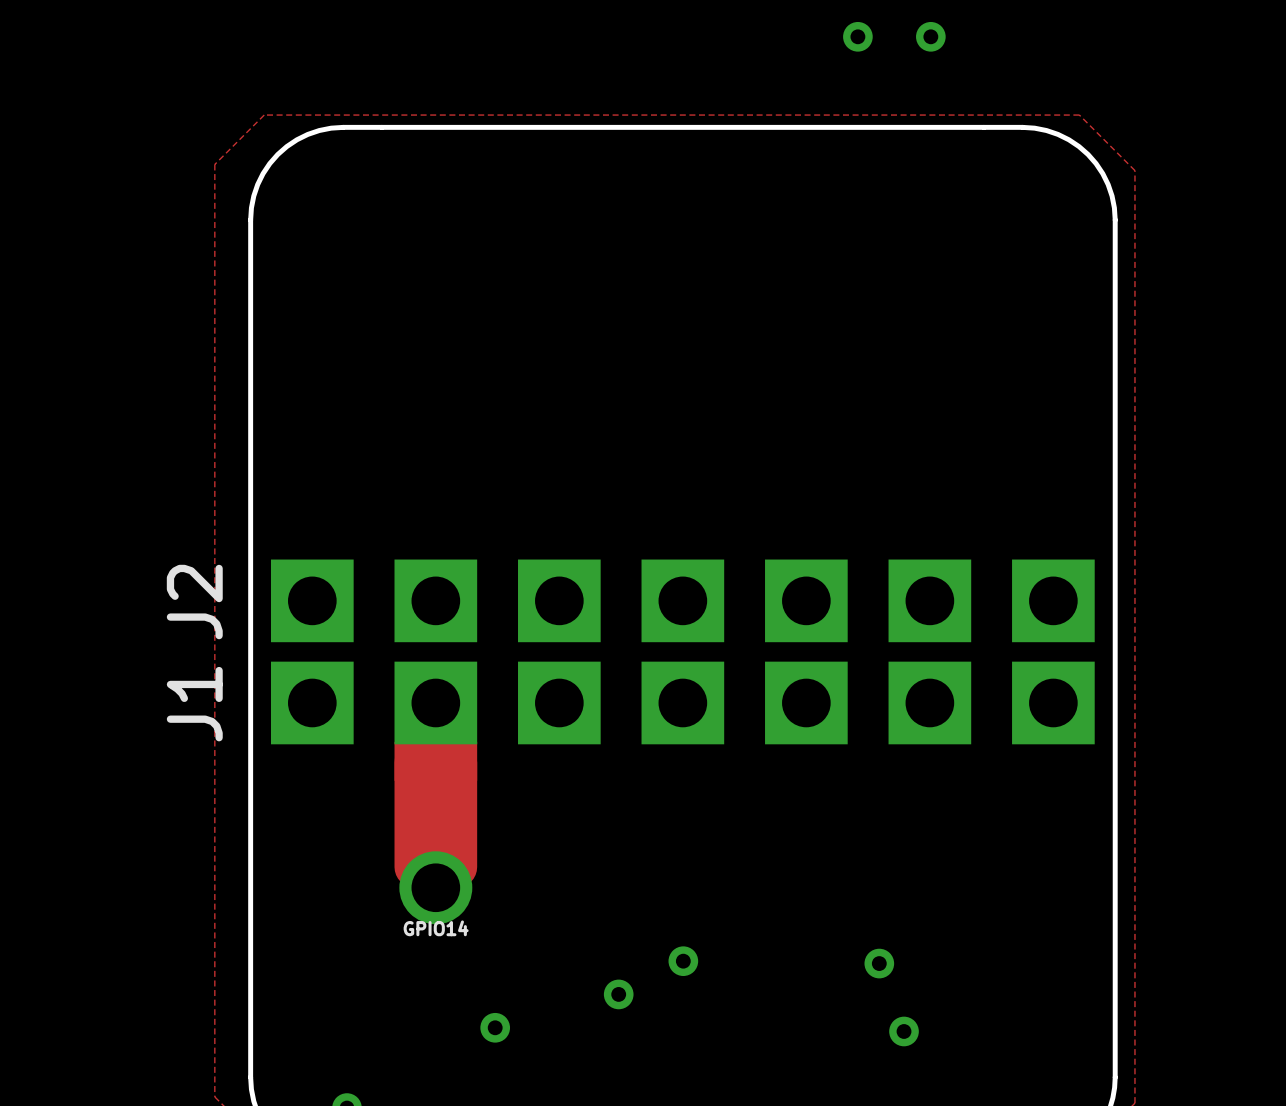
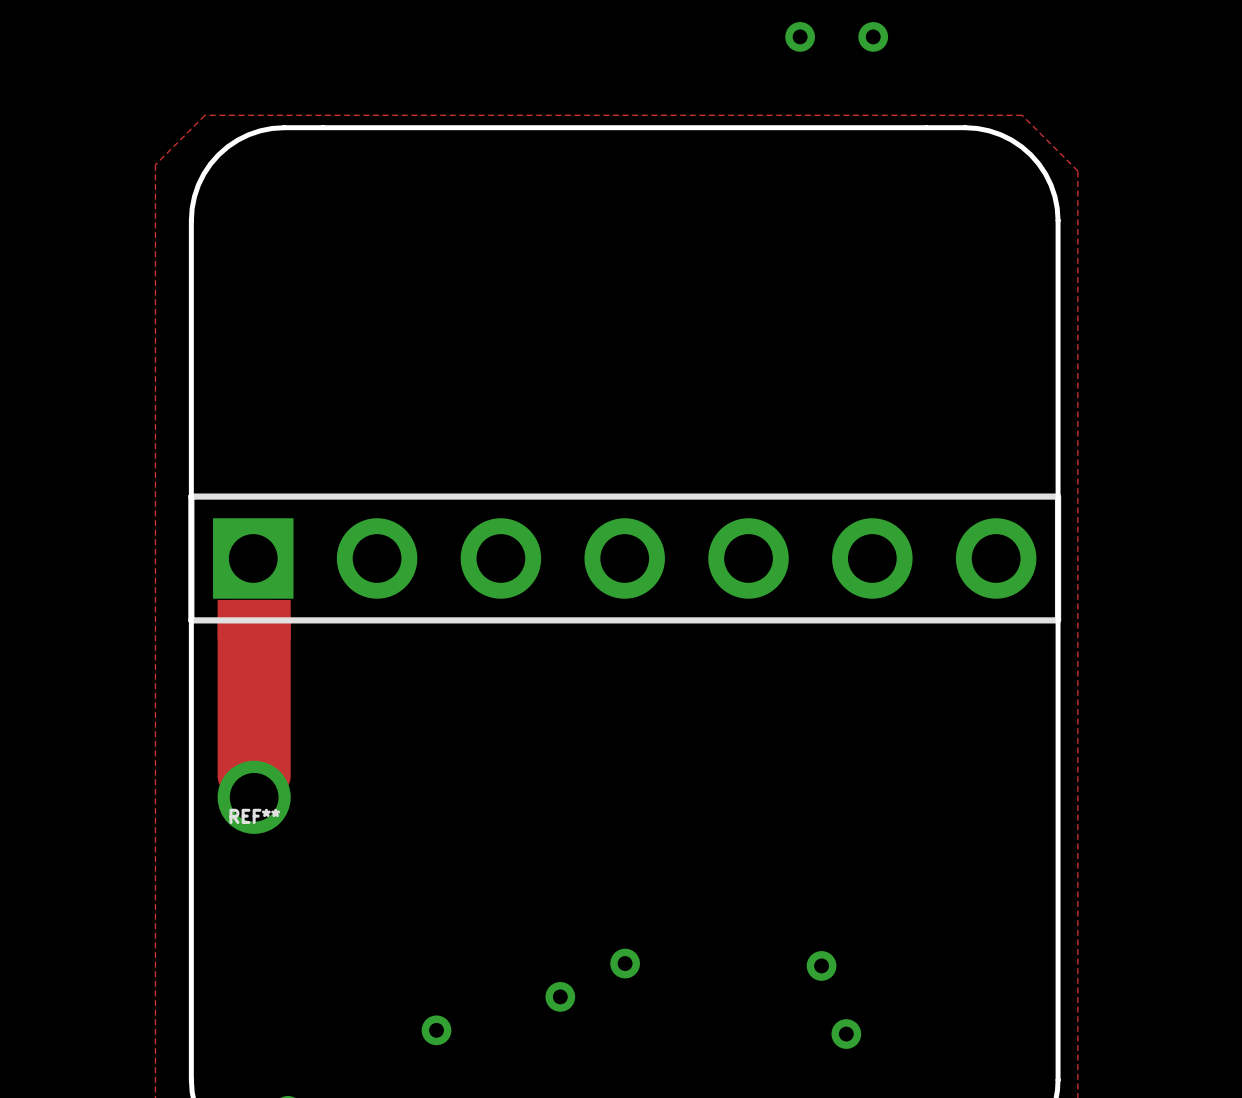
part: none -> (624, 558)
J2: (682, 600) -> none
REF**: none -> (254, 697)
J1: (682, 702) -> none
GPIO14: (435, 814) -> none
via position: (435, 887) -> (254, 797)

